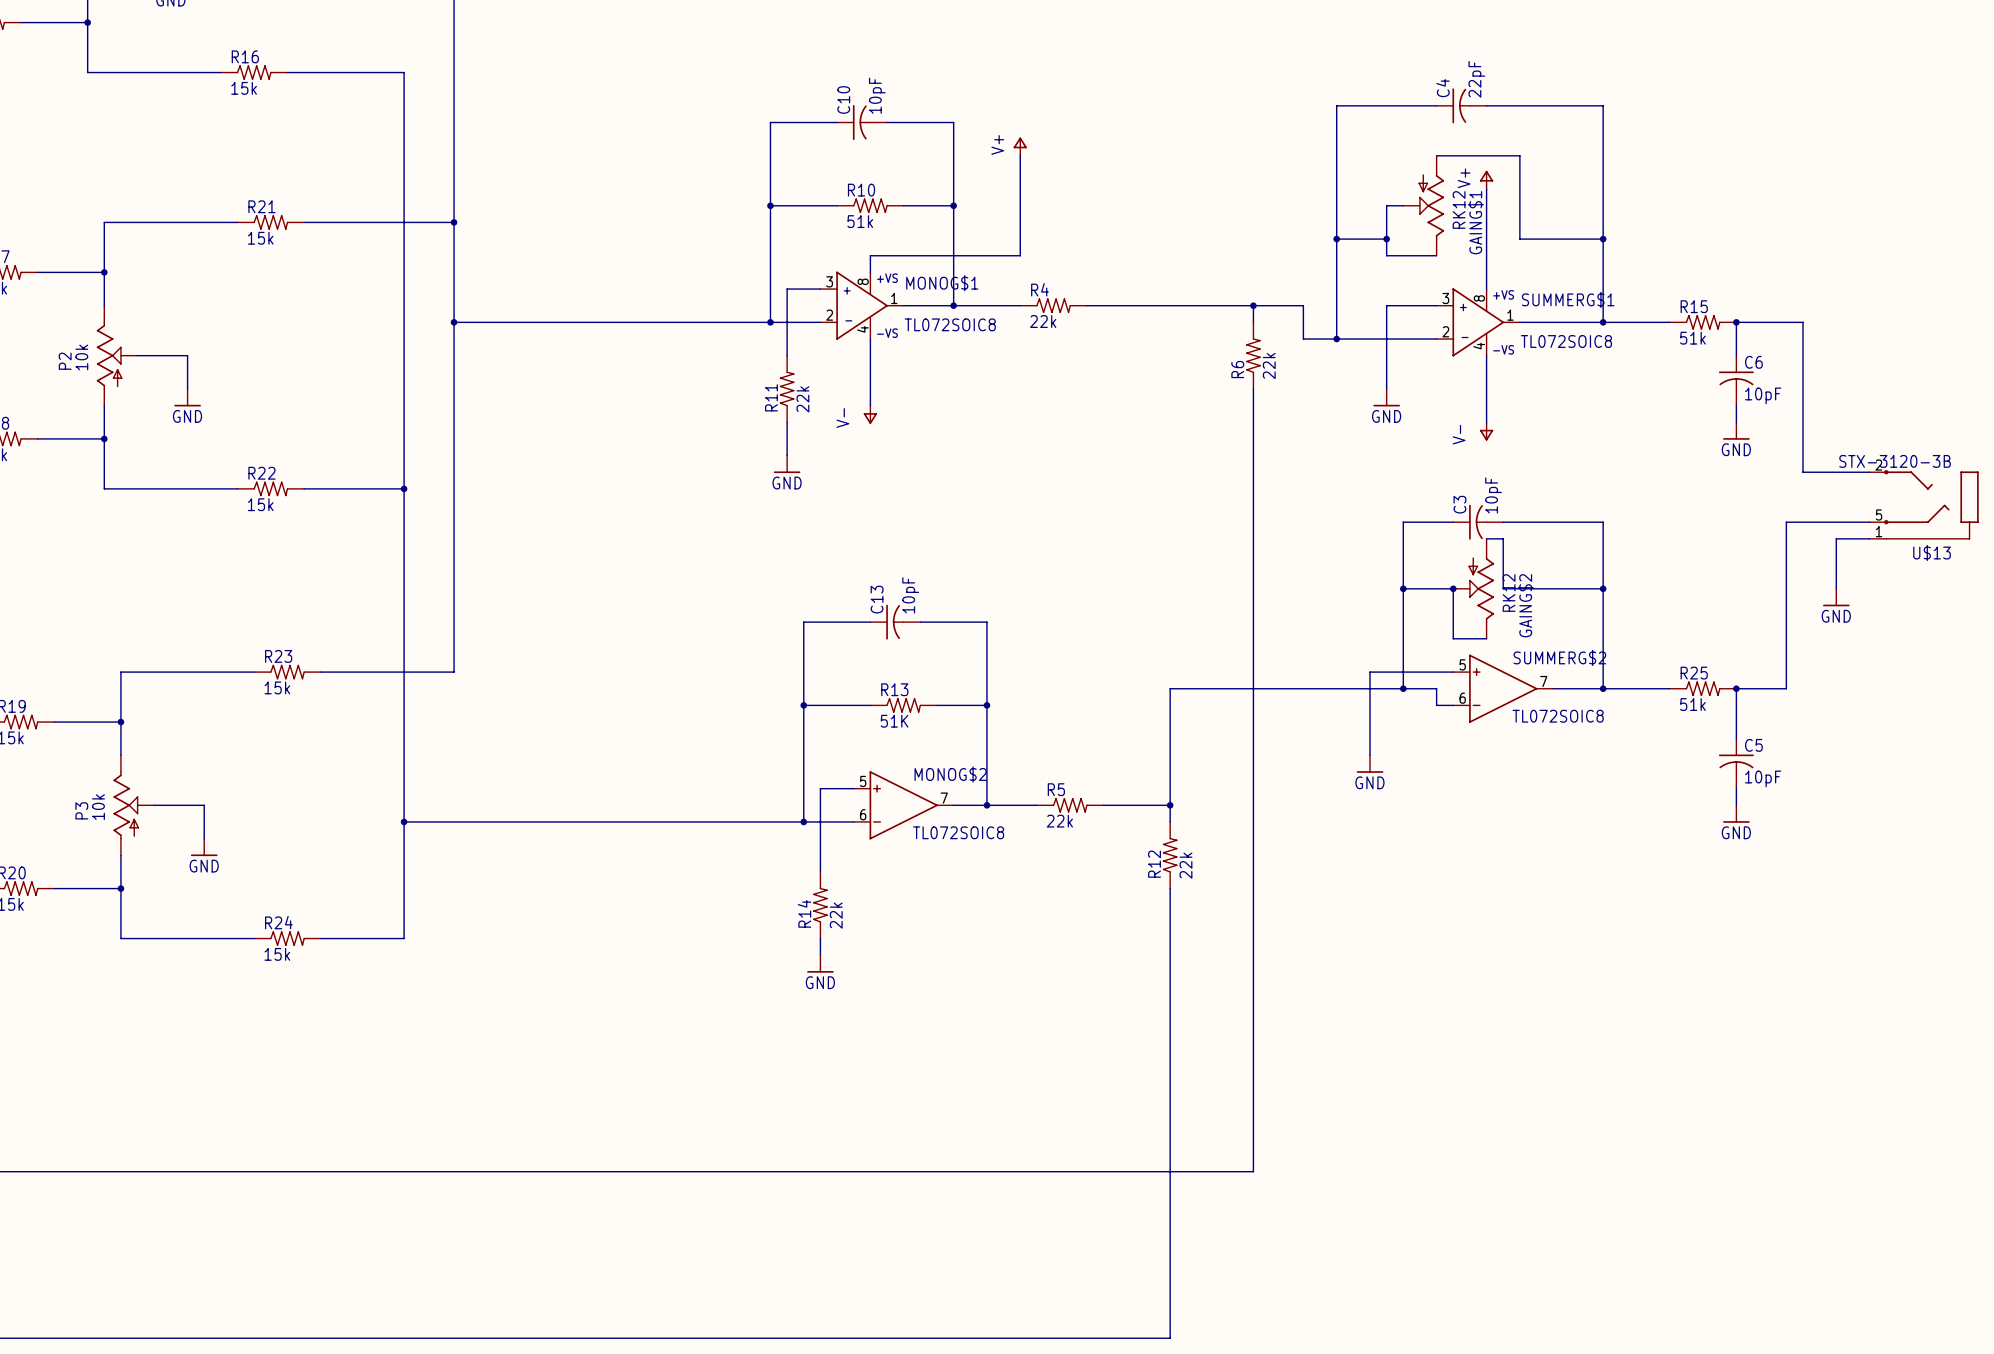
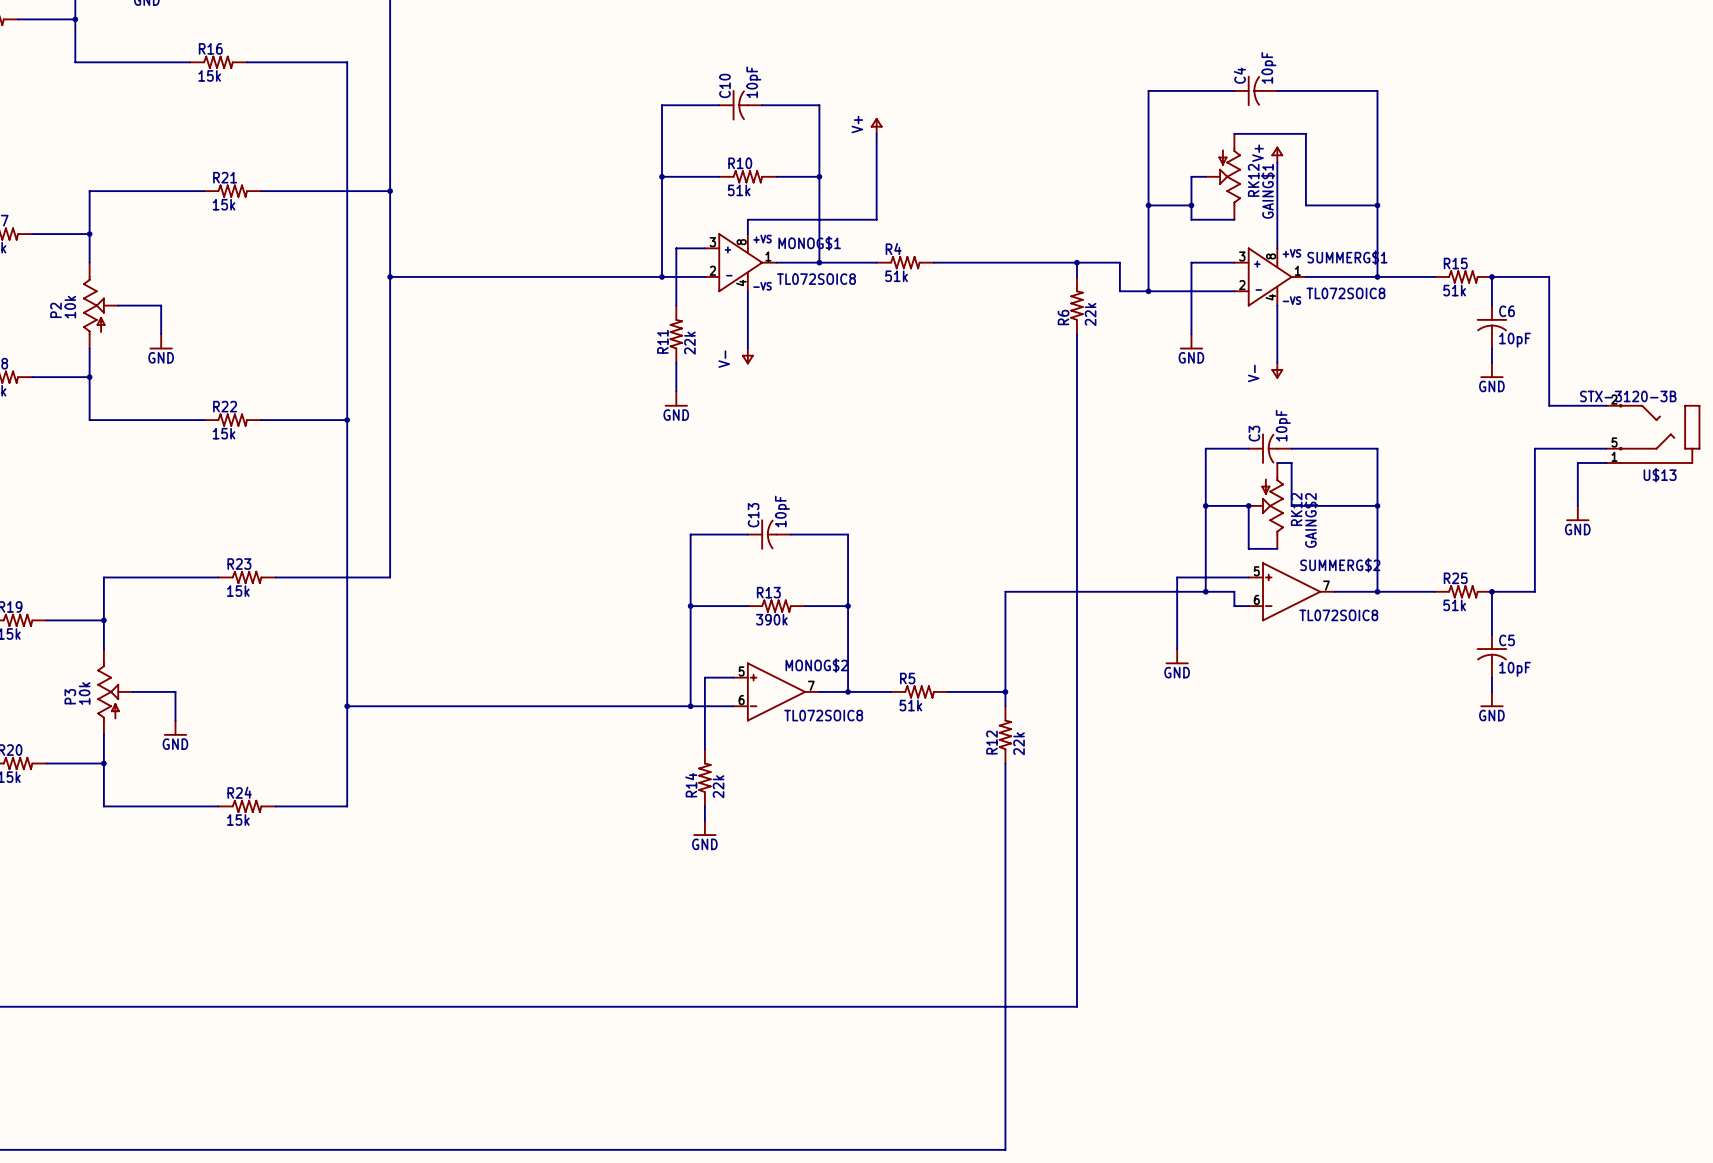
C4 value: 22pF (1476, 79) -> 10pF (1268, 67)
R4 value: 22k (1043, 321) -> 51k (896, 276)
R13 value: 51K (894, 721) -> 390k (771, 619)
R5 value: 22k (1059, 821) -> 51k (910, 705)

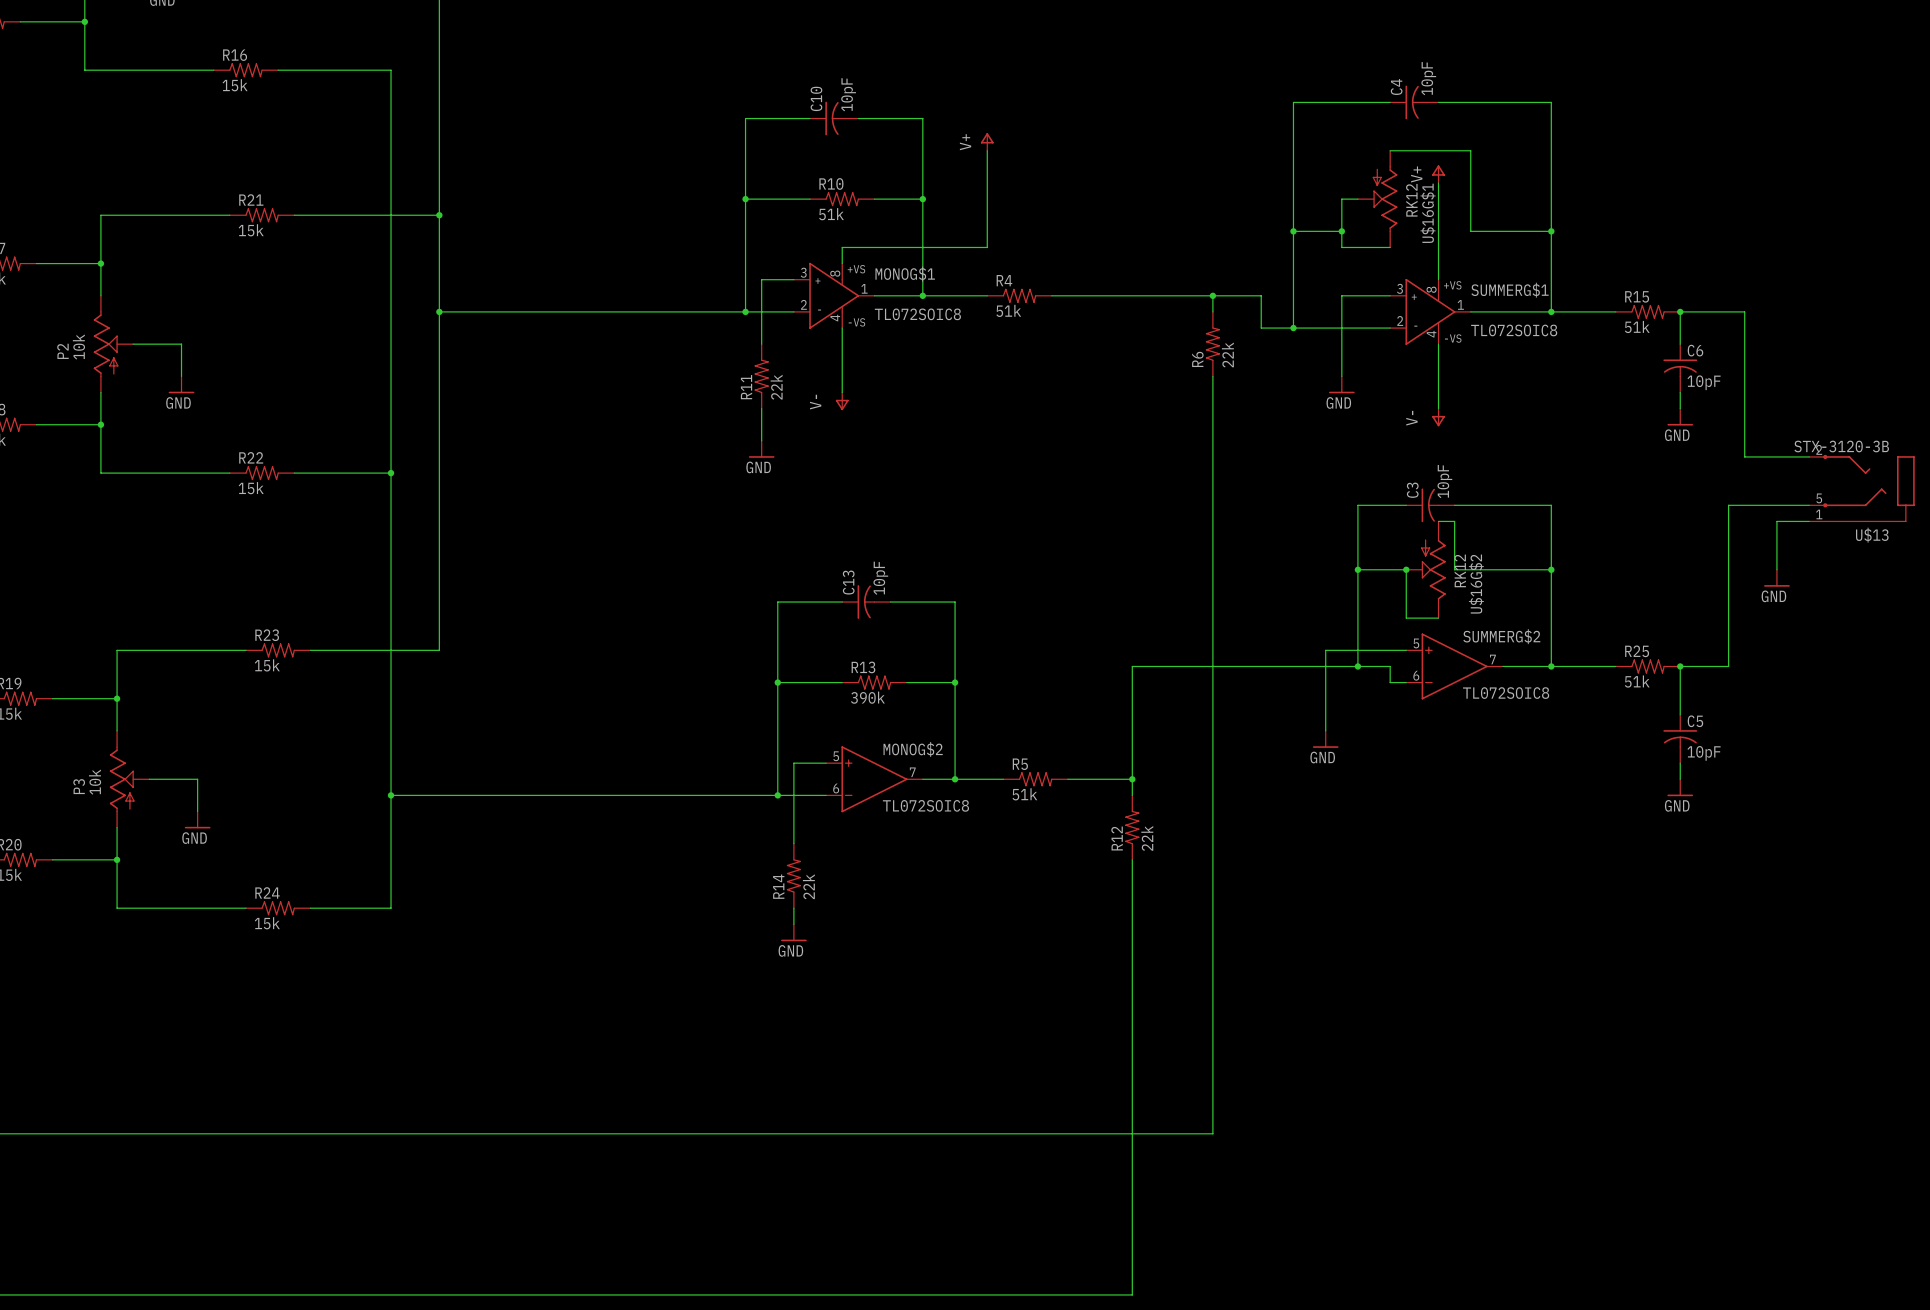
GAING$1 name: GAING$1 (1268, 191) -> U$16G$1 (1428, 213)
GAING$2 name: GAING$2 (1310, 520) -> U$16G$2 (1476, 584)

